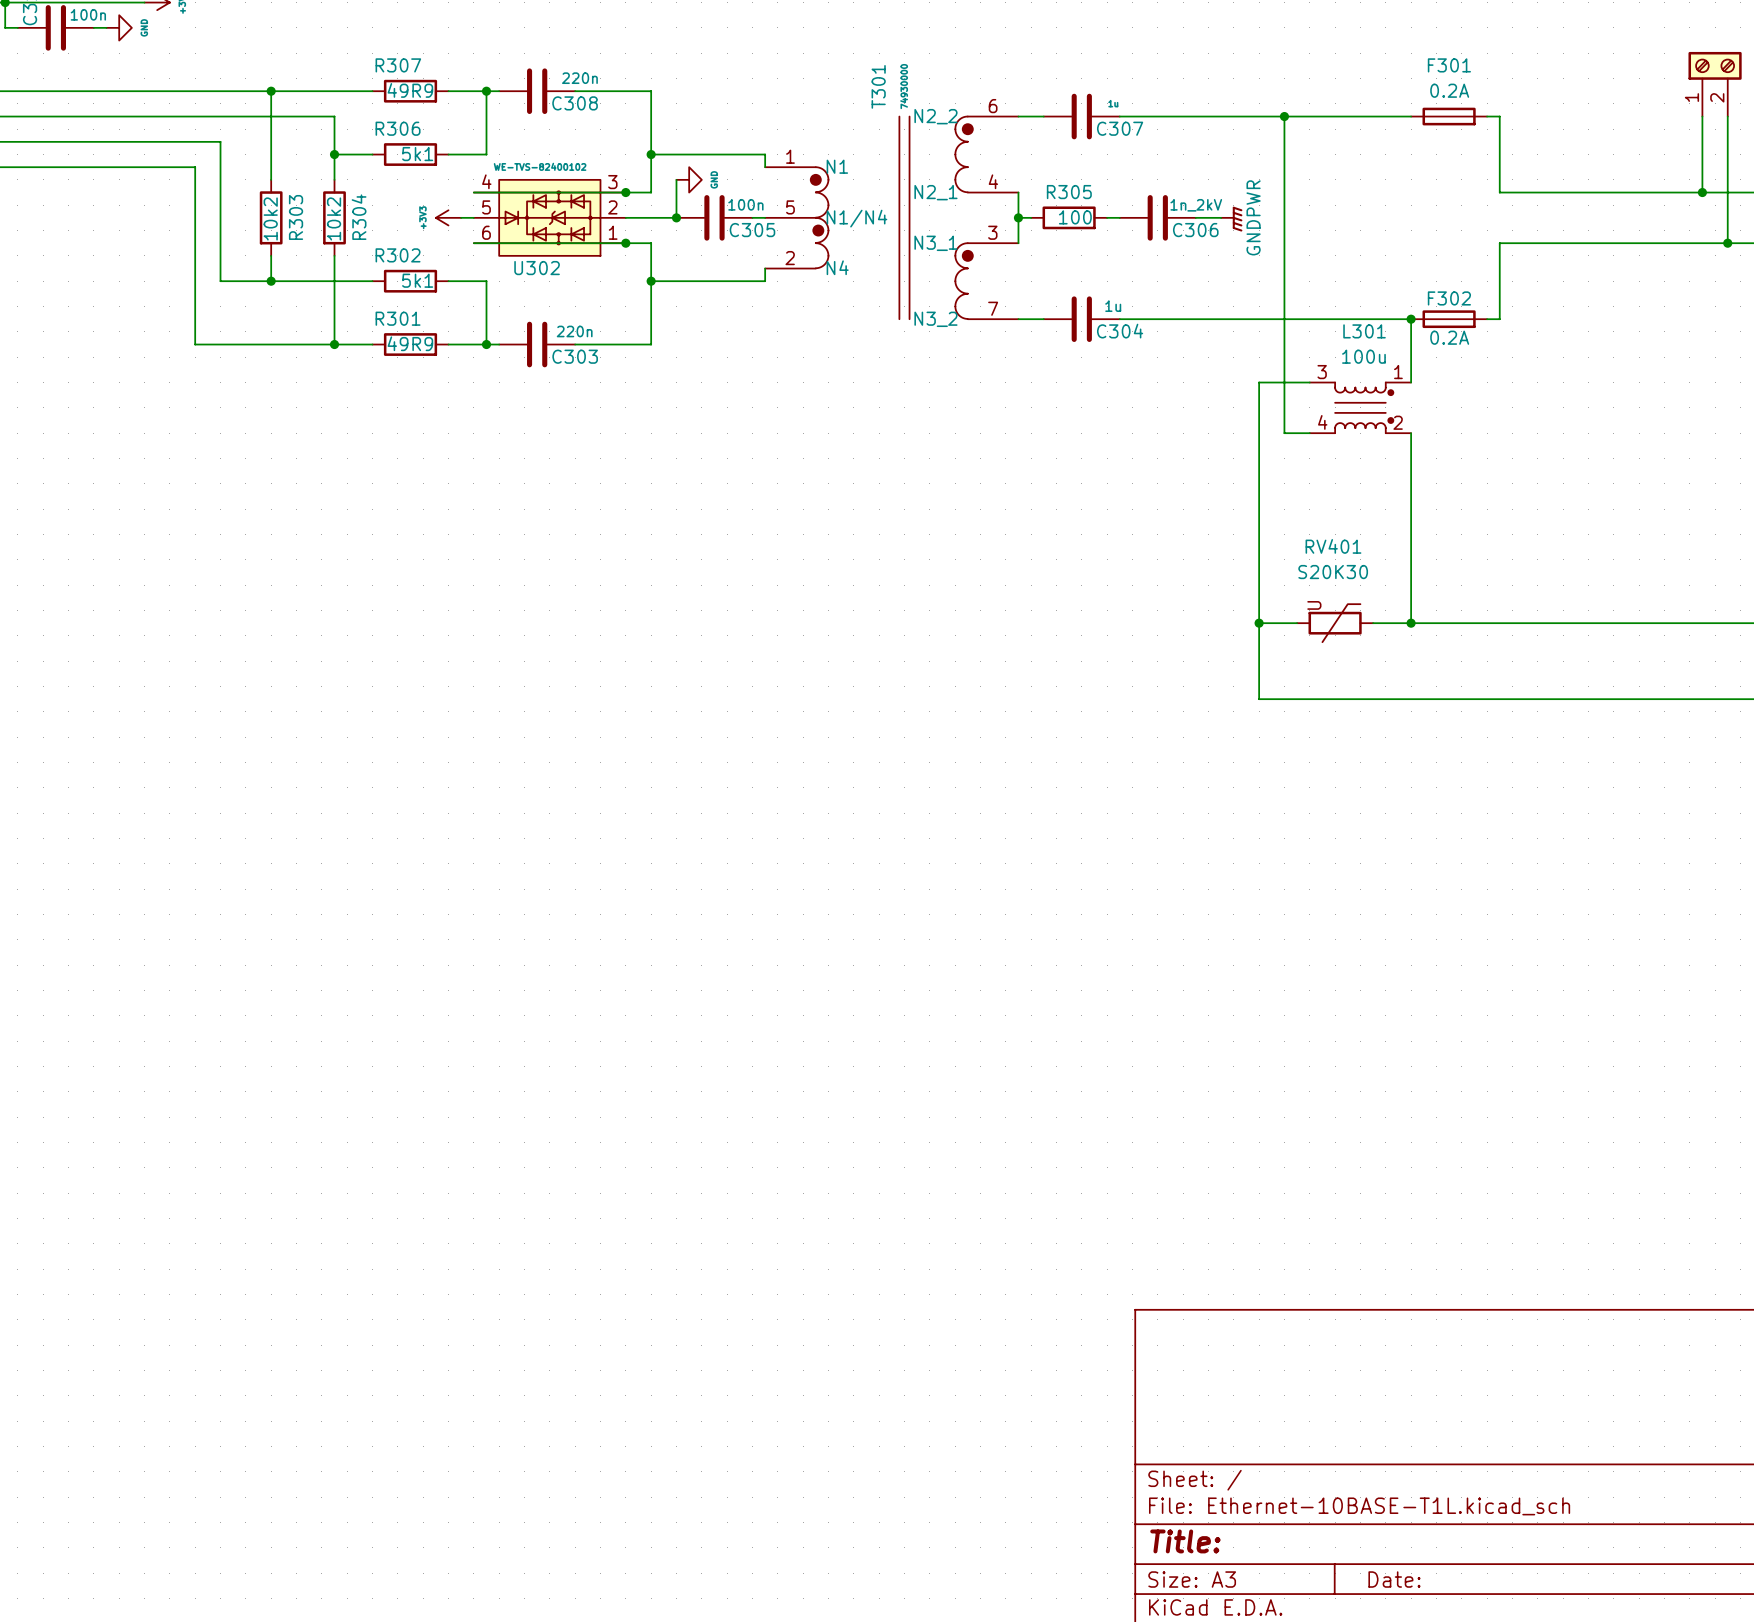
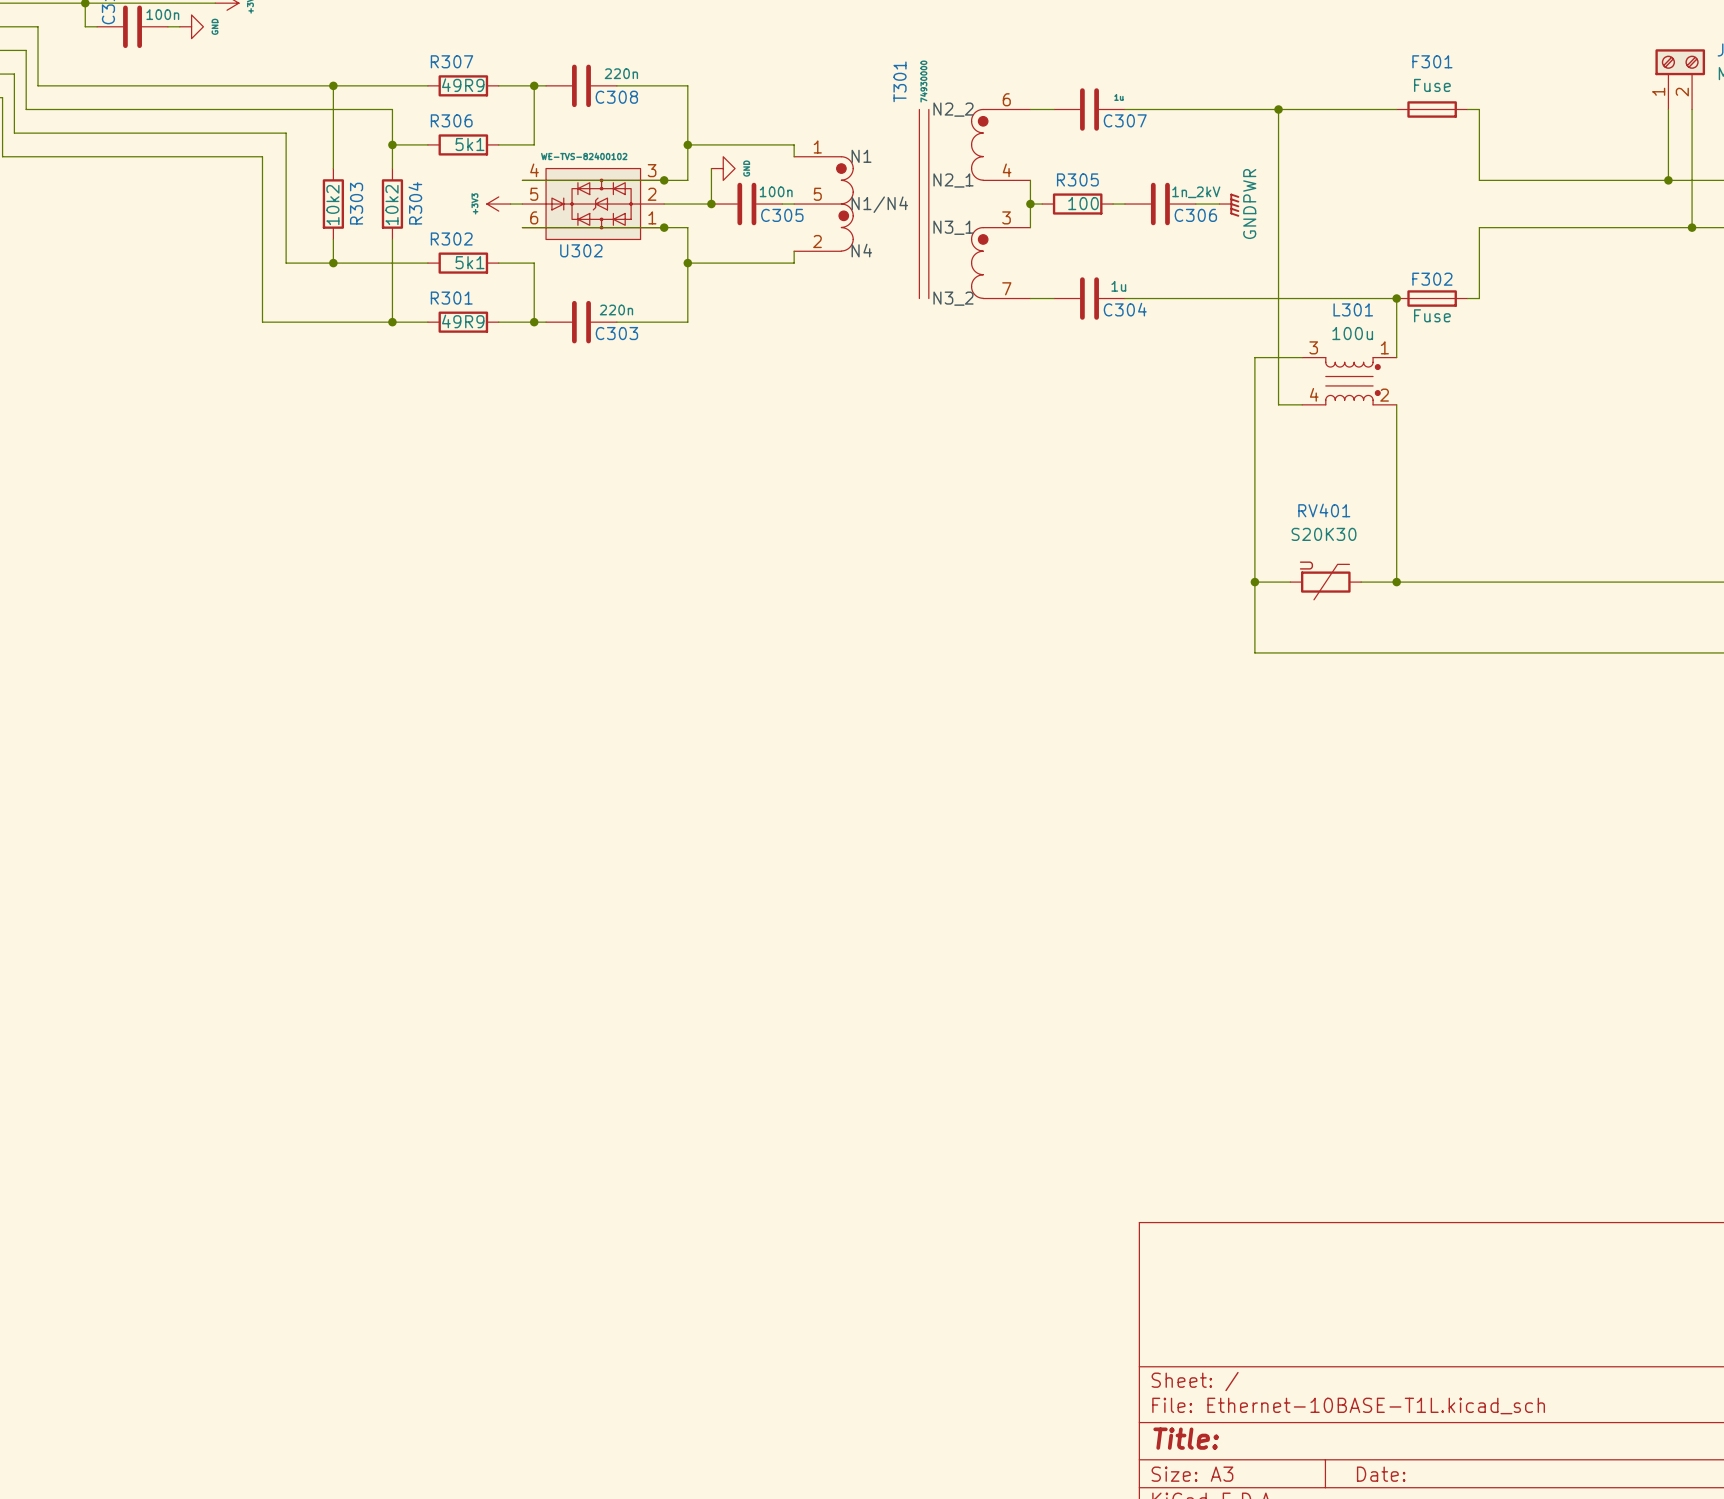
F301 value: 0.2A (1449, 90) -> Fuse (1432, 85)
F302 value: 0.2A (1449, 337) -> Fuse (1432, 315)

